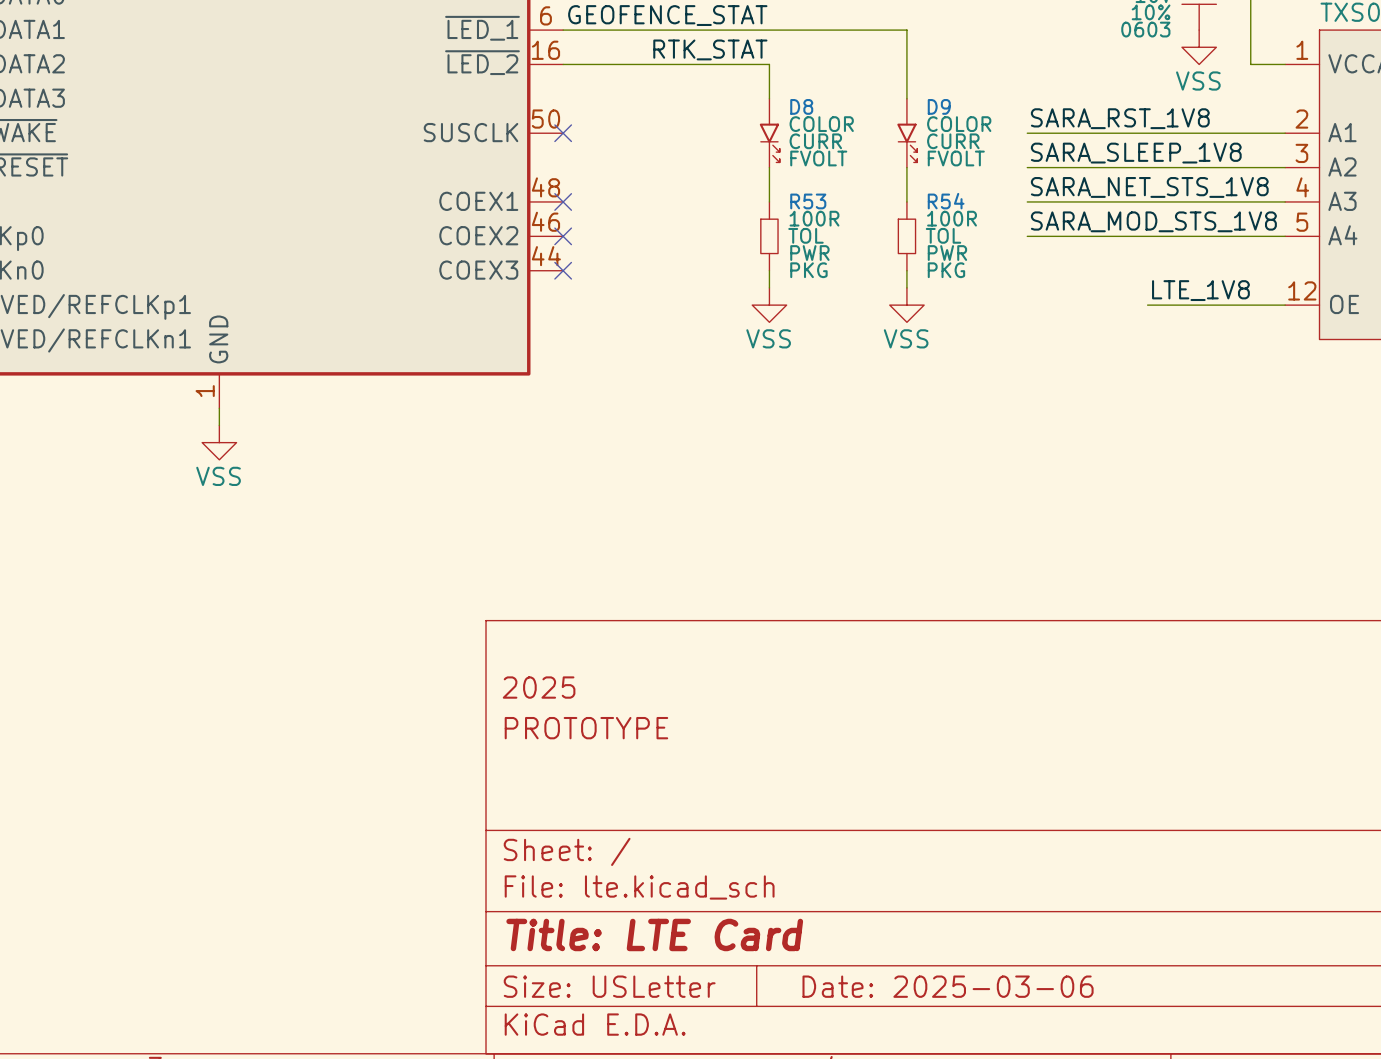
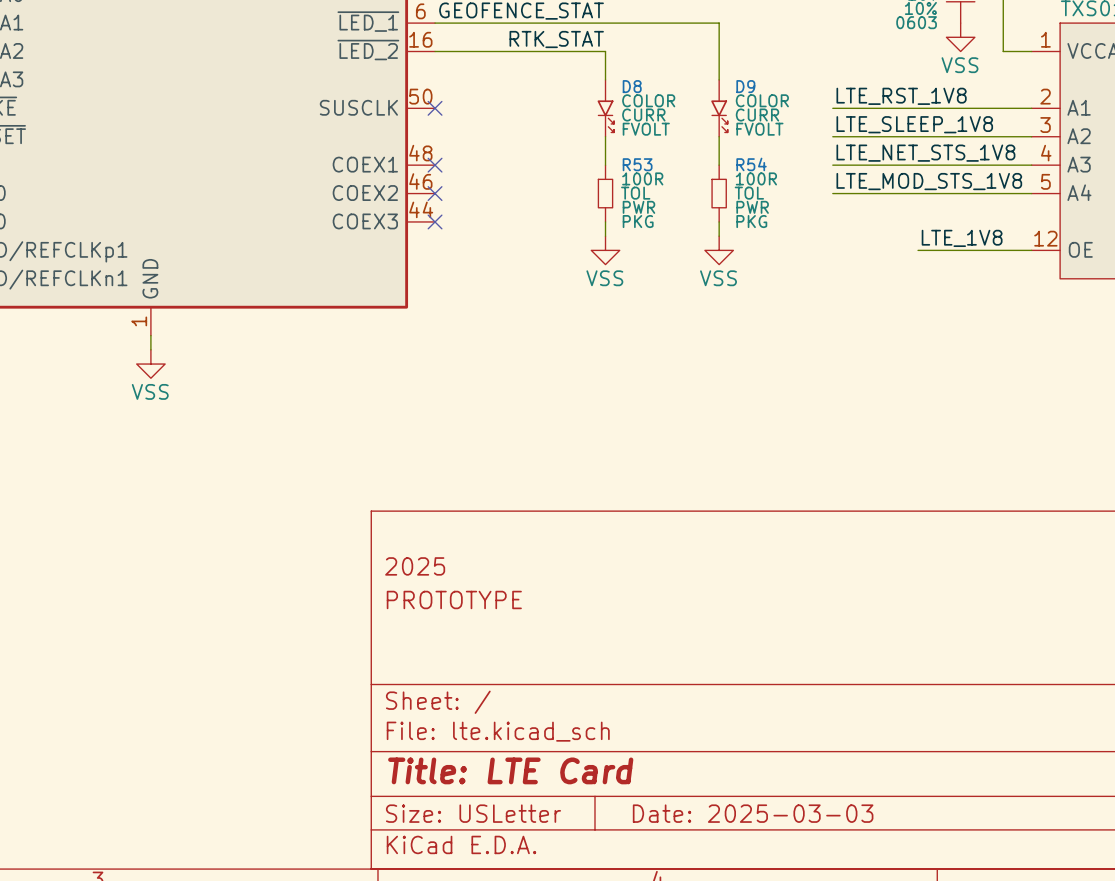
label: SARA_RST_1V8 (1120, 118) -> LTE_RST_1V8 (901, 96)
wire: (1027, 133) (1044, 133) -> none
label: SARA_SLEEP_1V8 (1136, 153) -> LTE_SLEEP_1V8 (914, 124)
wire: (1027, 167) (1044, 167) -> none
label: SARA_NET_STS_1V8 (1149, 187) -> LTE_NET_STS_1V8 (925, 153)
wire: (1027, 201) (1044, 201) -> none
label: SARA_MOD_STS_1V8 (1153, 221) -> LTE_MOD_STS_1V8 (929, 181)
wire: (1027, 236) (1044, 236) -> none
title block: Date: 2025-03-06 (948, 986) -> Date: 2025-03-03 (753, 813)

